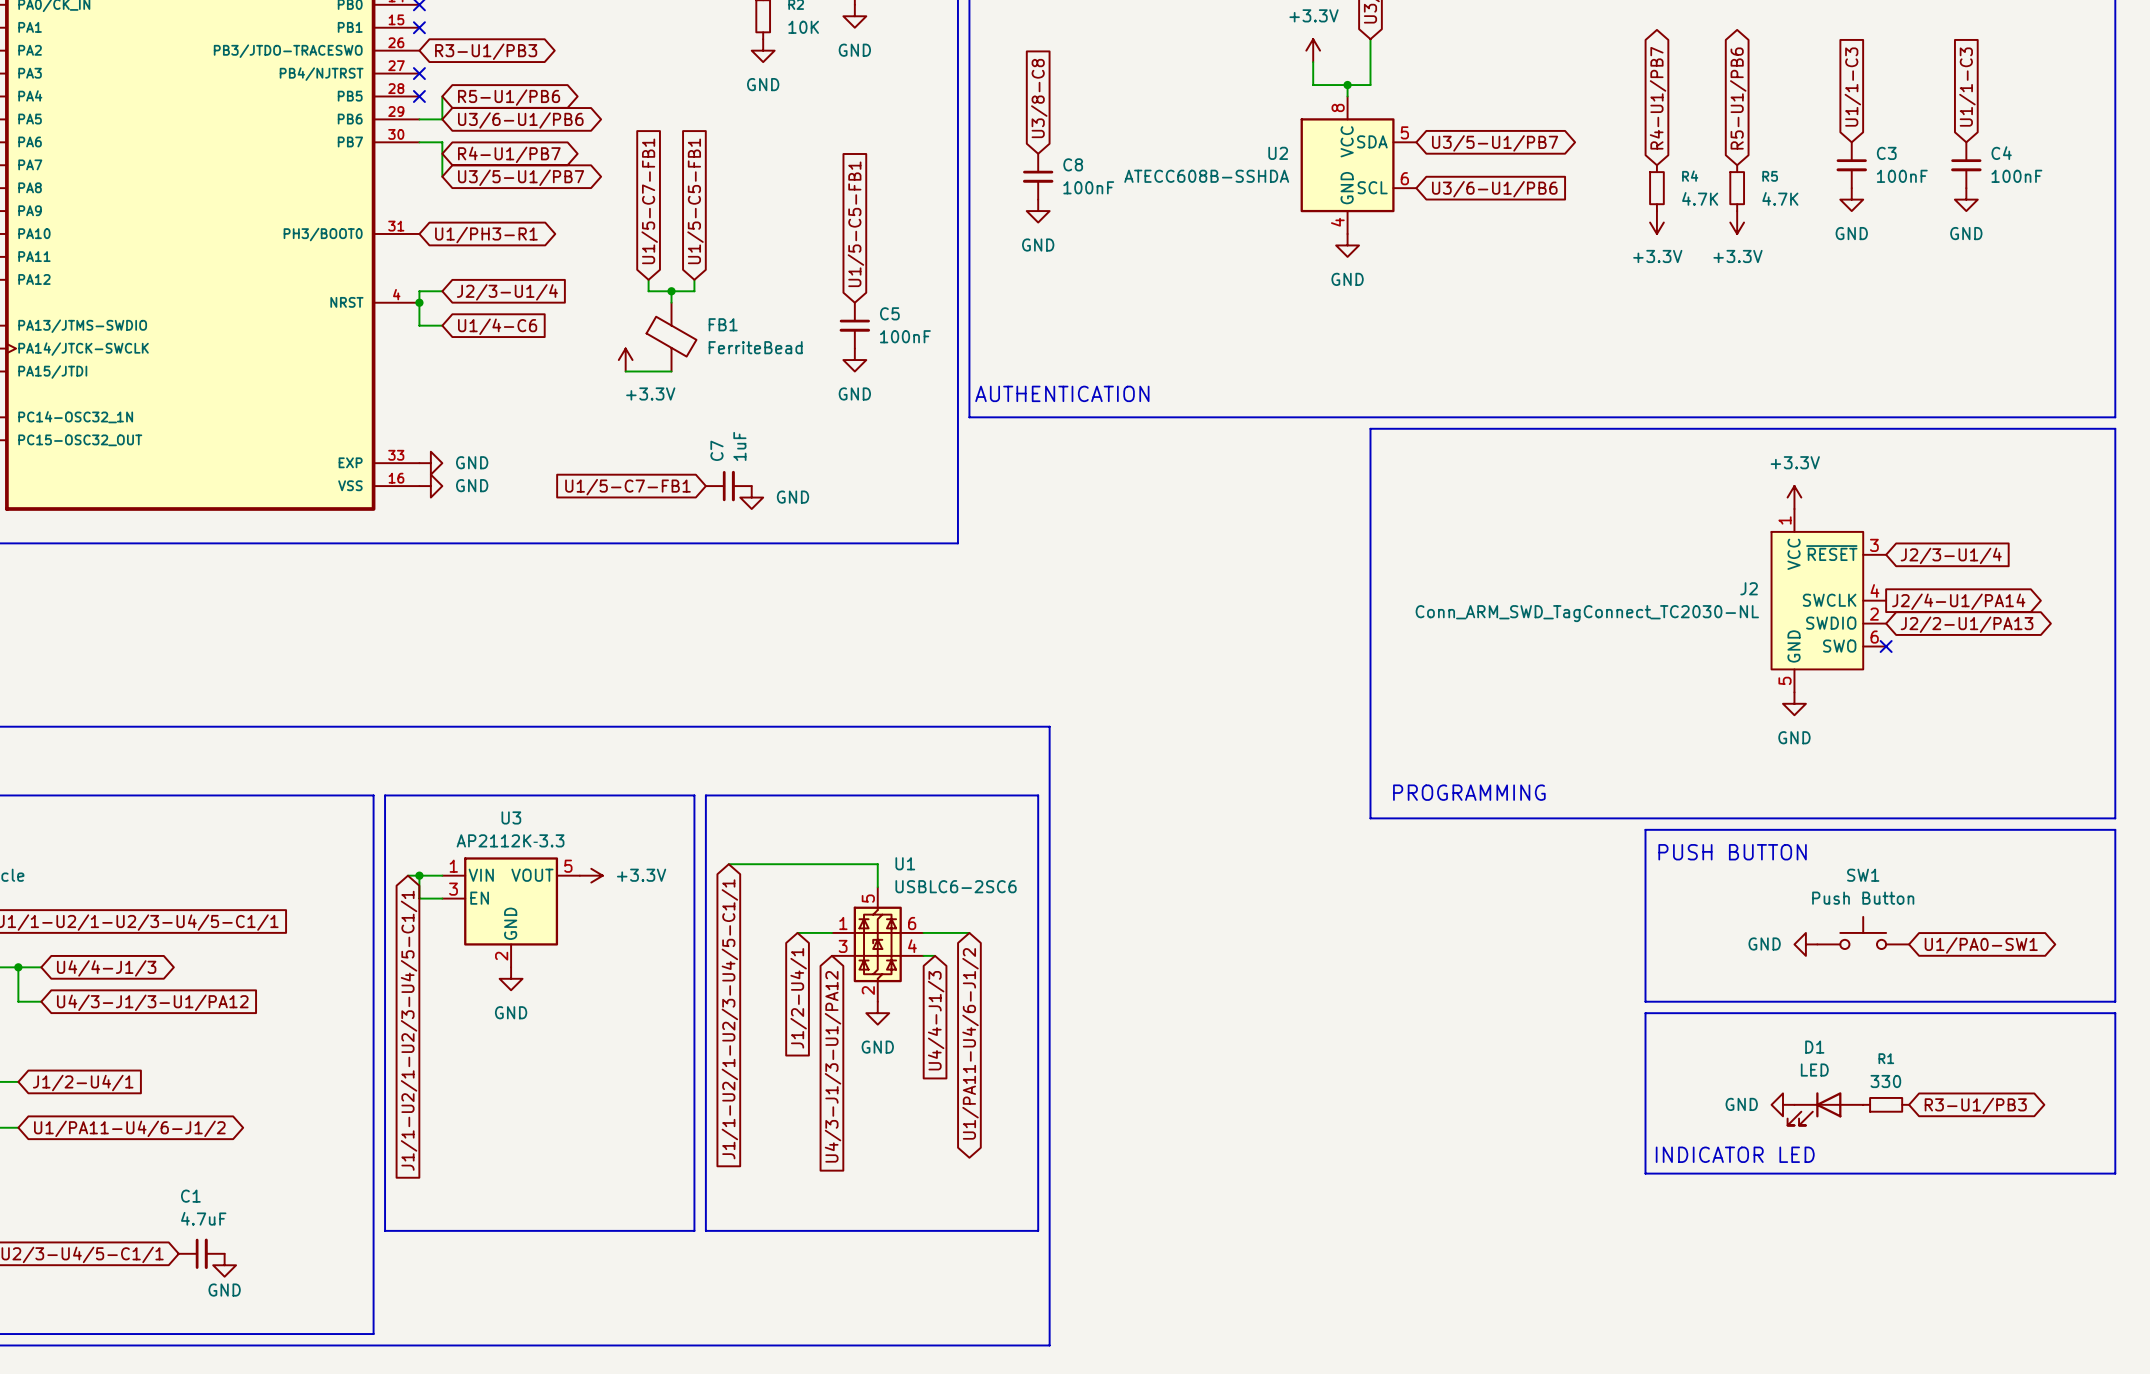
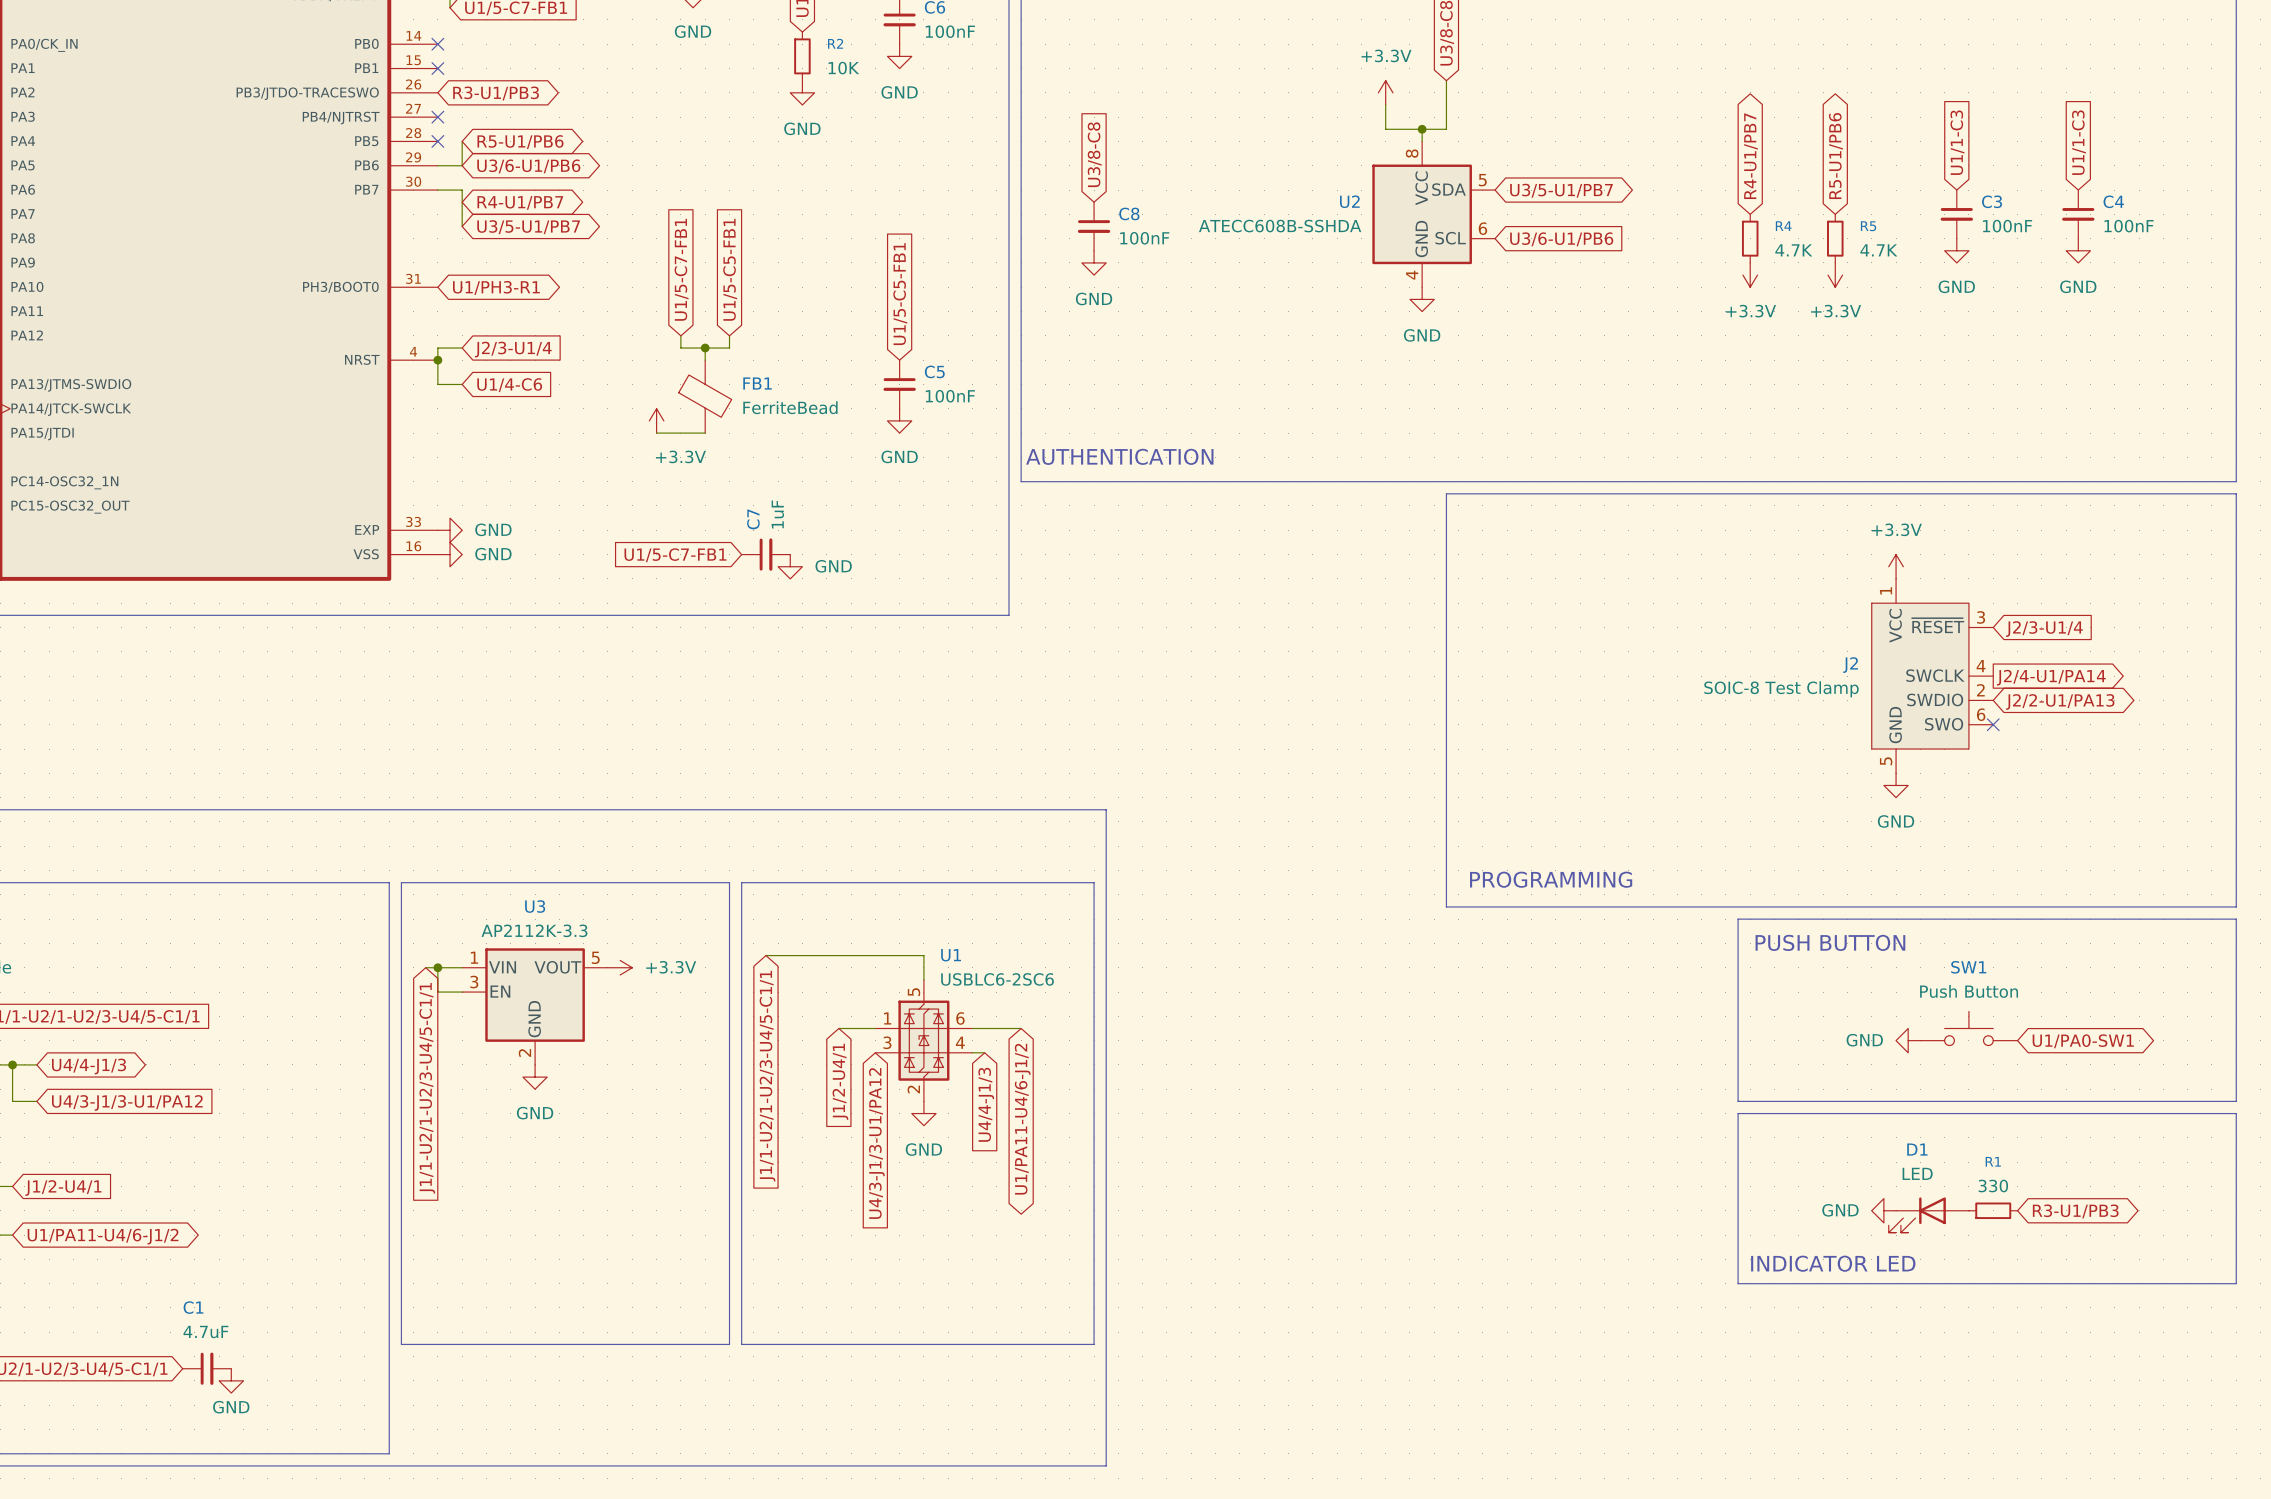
J2 value: Conn_ARM_SWD_TagConnect_TC2030-NL (1587, 613) -> SOIC-8 Test Clamp (1781, 689)

